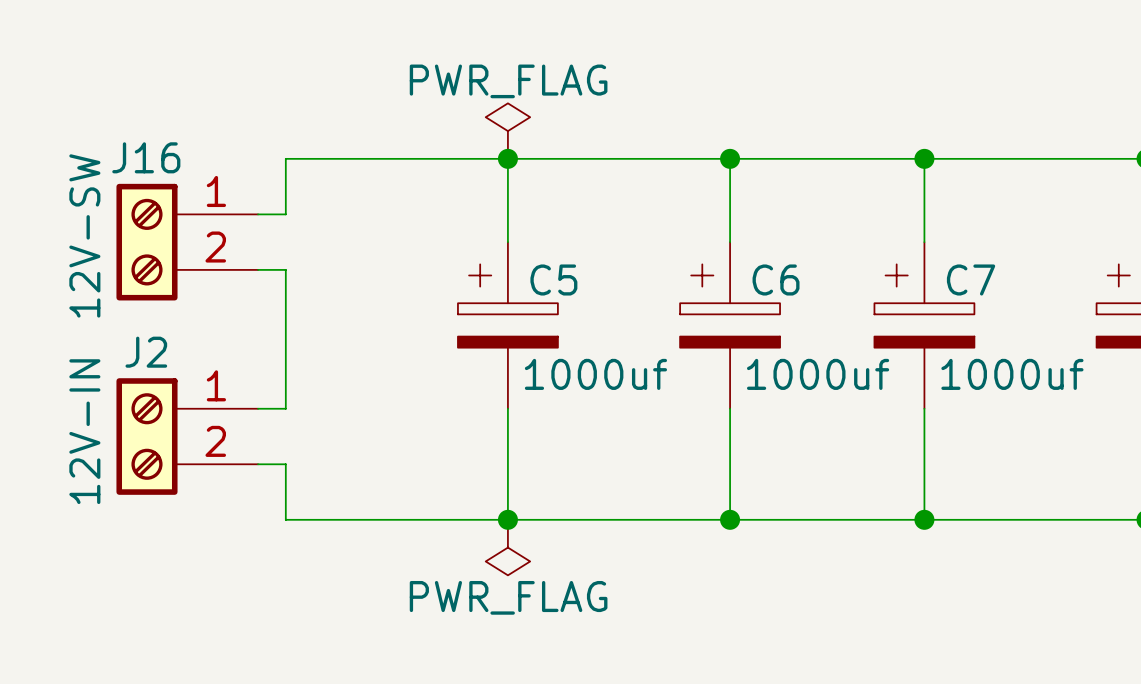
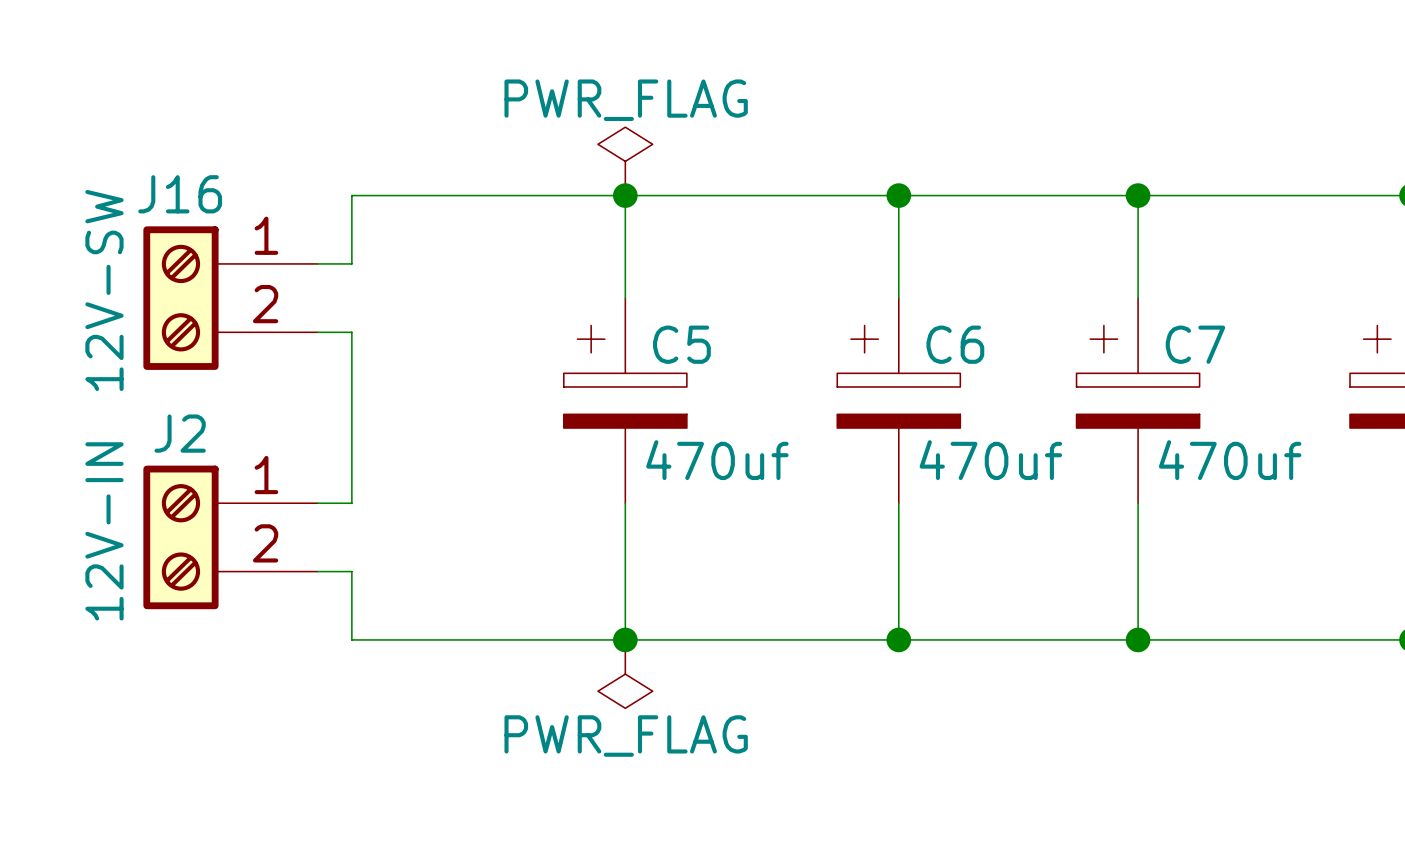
C5 value: 1000uf (595, 374) -> 470uf (717, 460)
C6 value: 1000uf (818, 374) -> 470uf (990, 460)
C7 value: 1000uf (1012, 374) -> 470uf (1230, 460)

